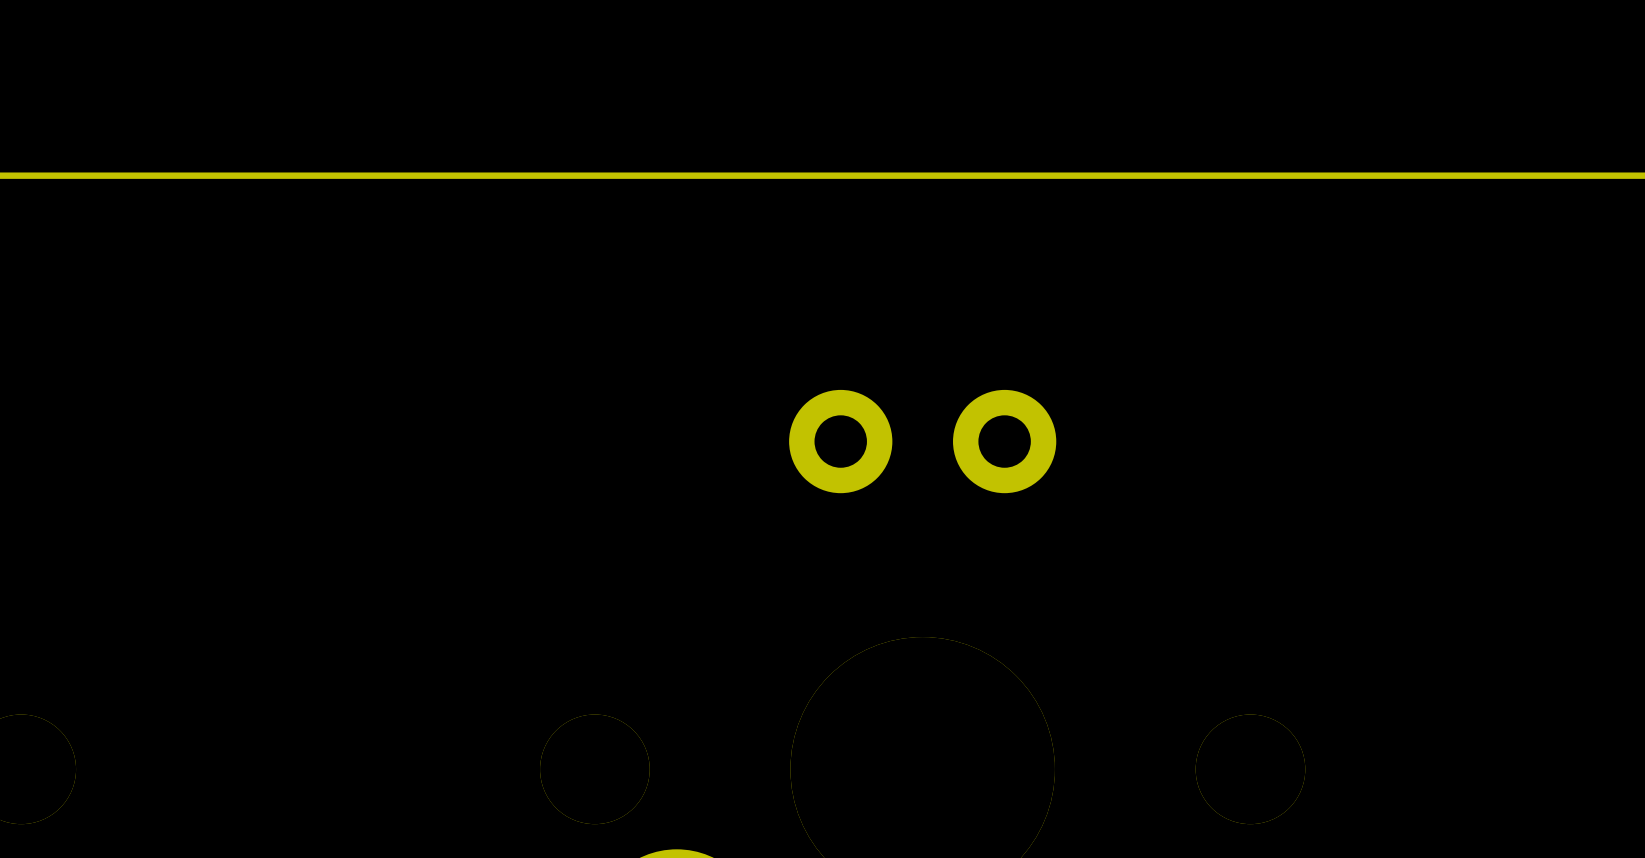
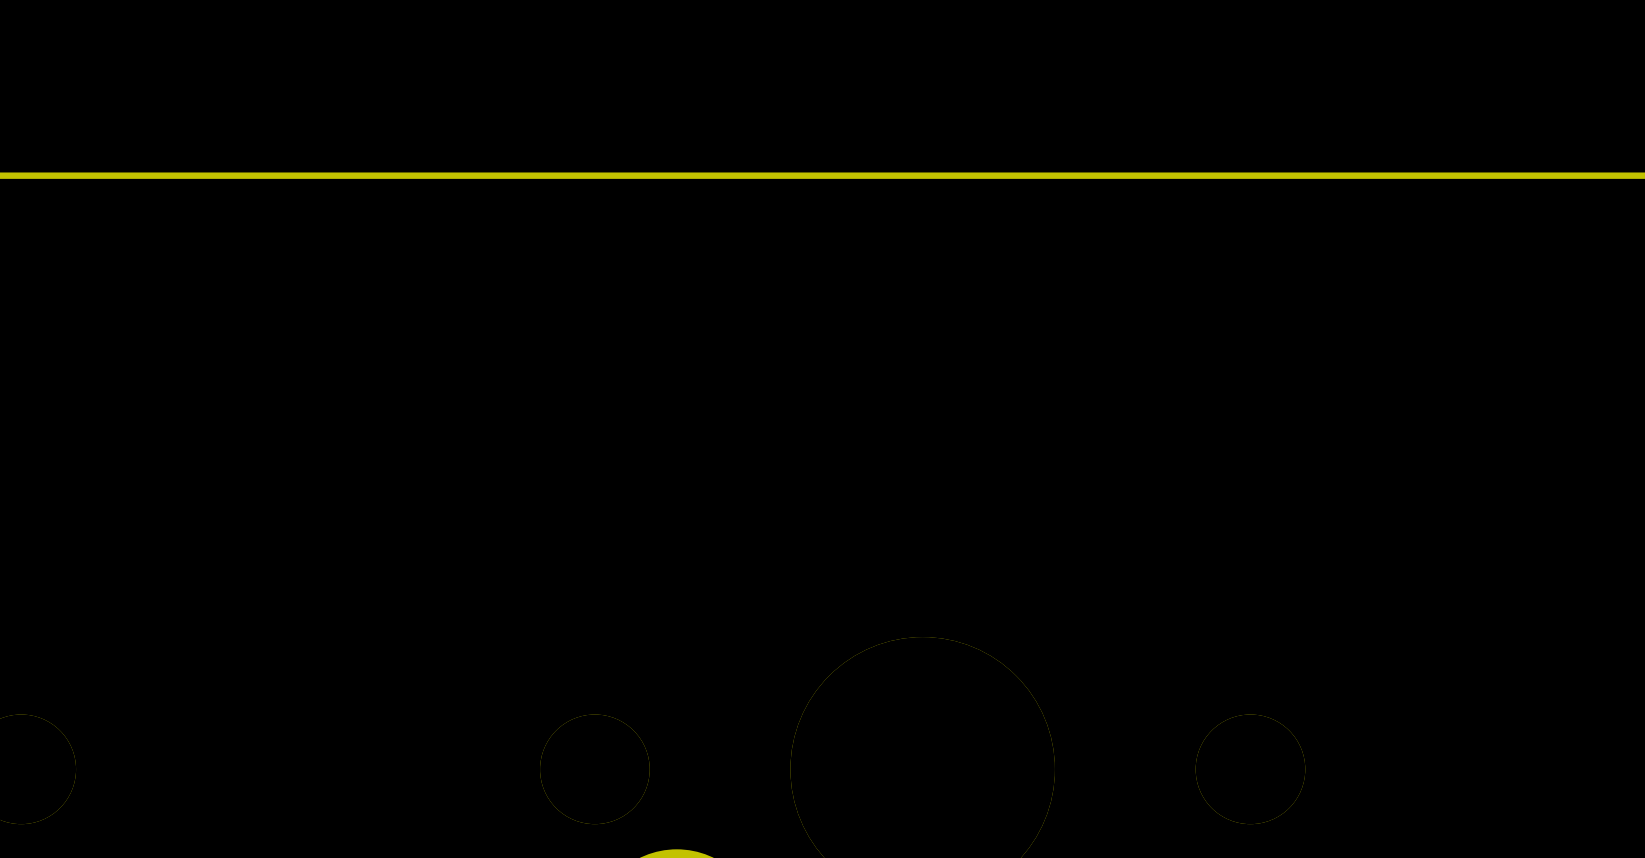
part: (922, 441) -> none

